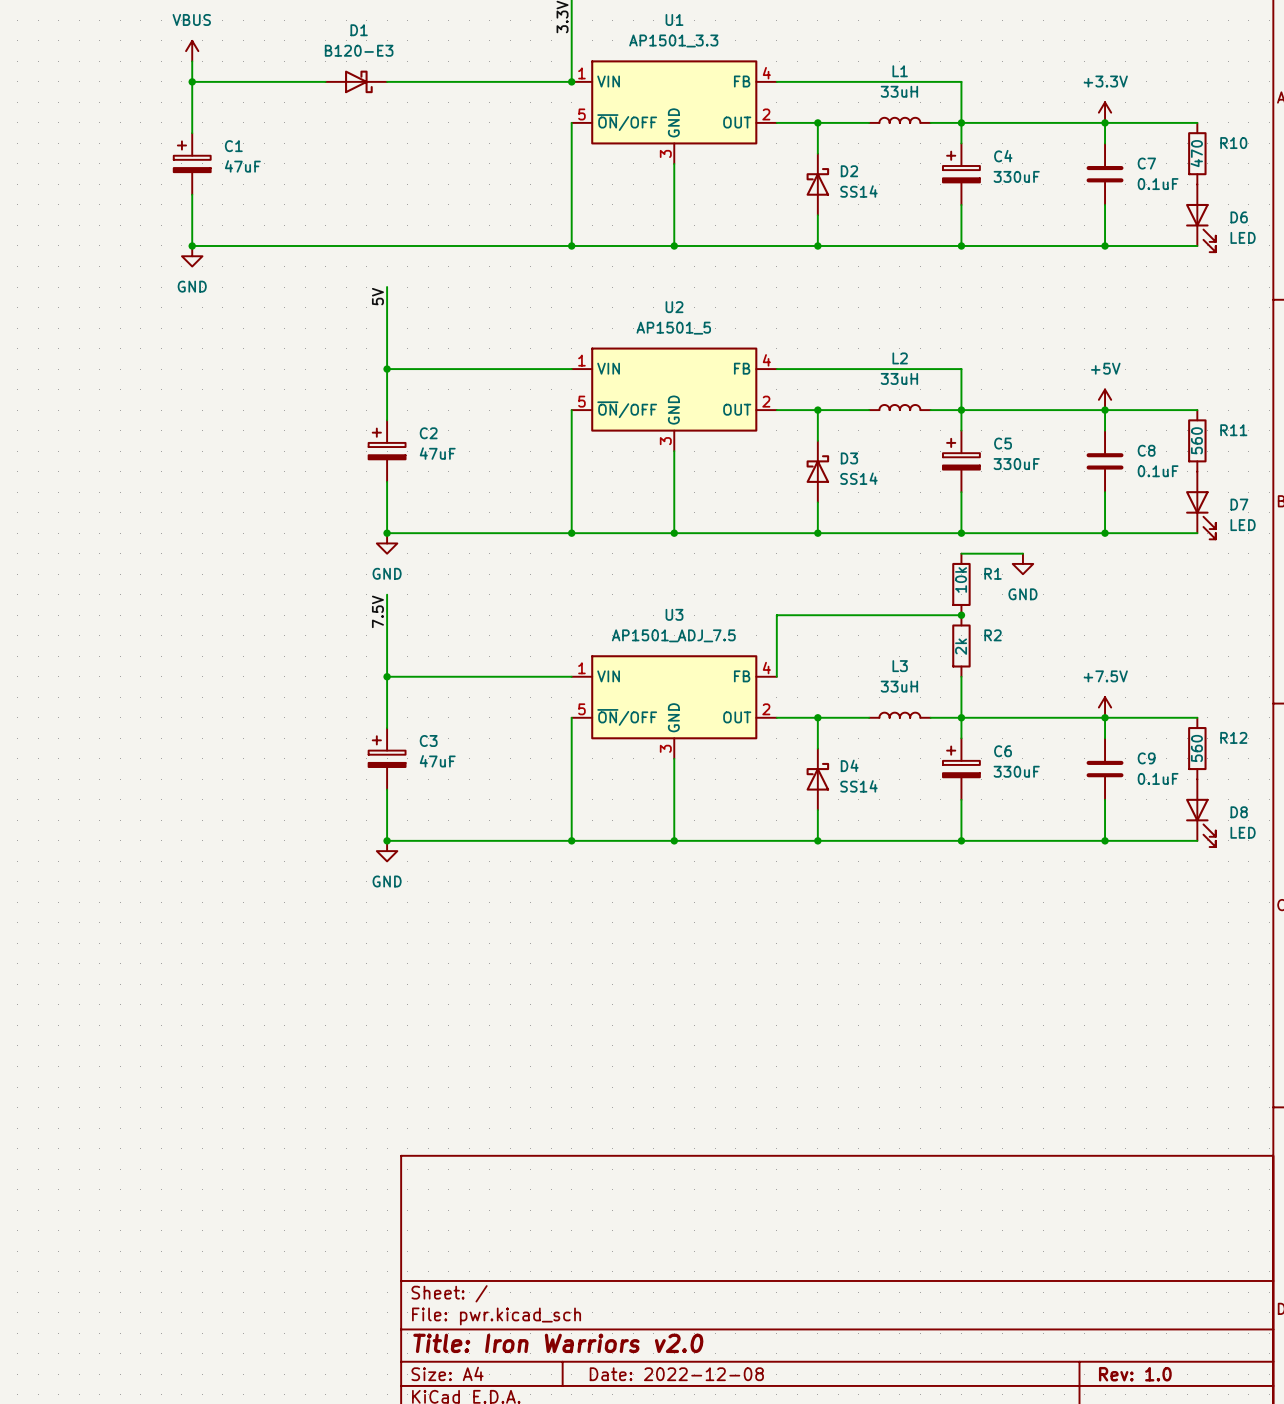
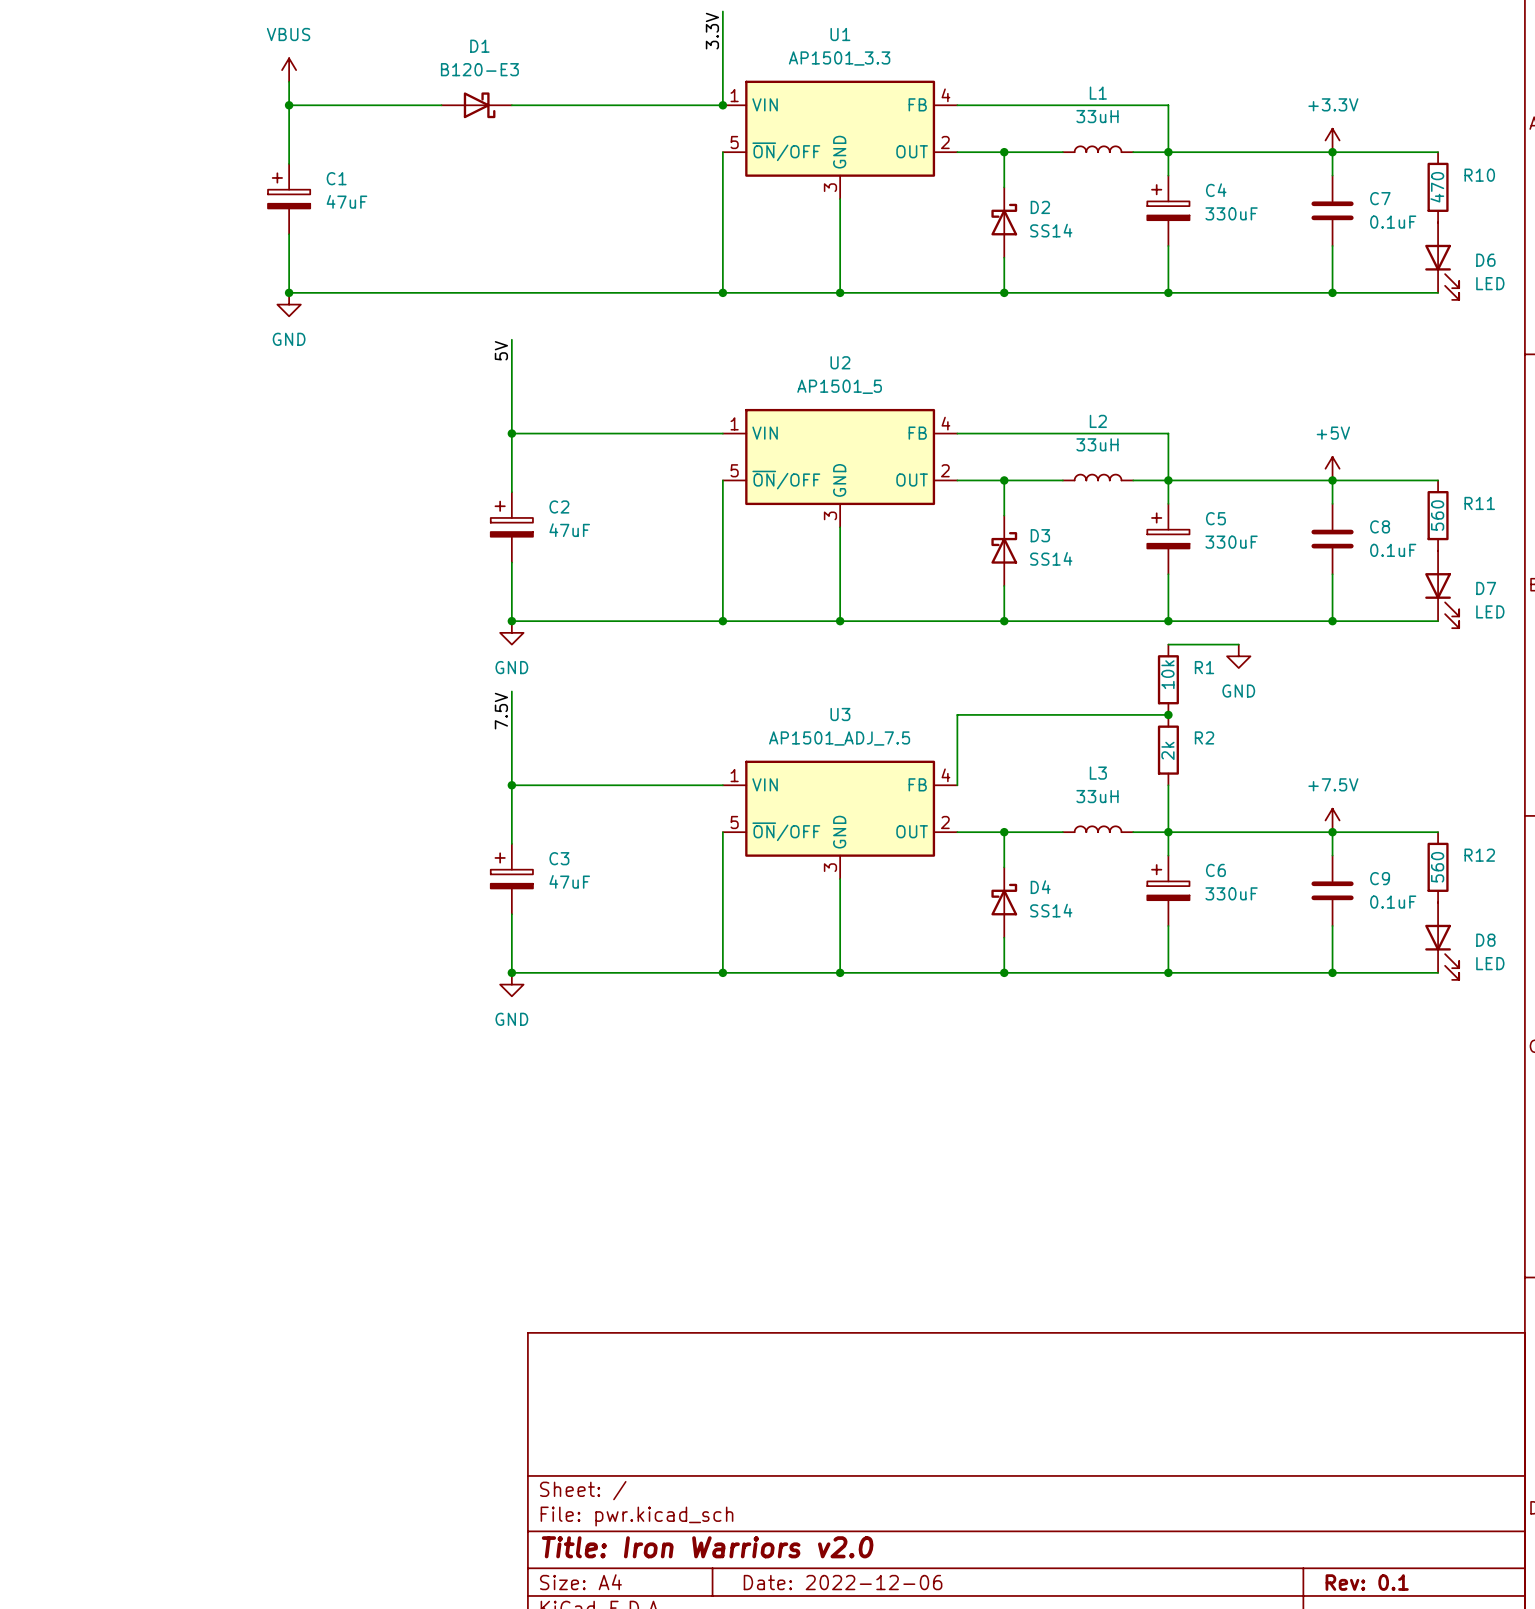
title block: Date: 2022-12-08 (676, 1374) -> Date: 2022-12-06 (843, 1582)
title block: Rev: 1.0 (1135, 1374) -> Rev: 0.1 (1367, 1582)

